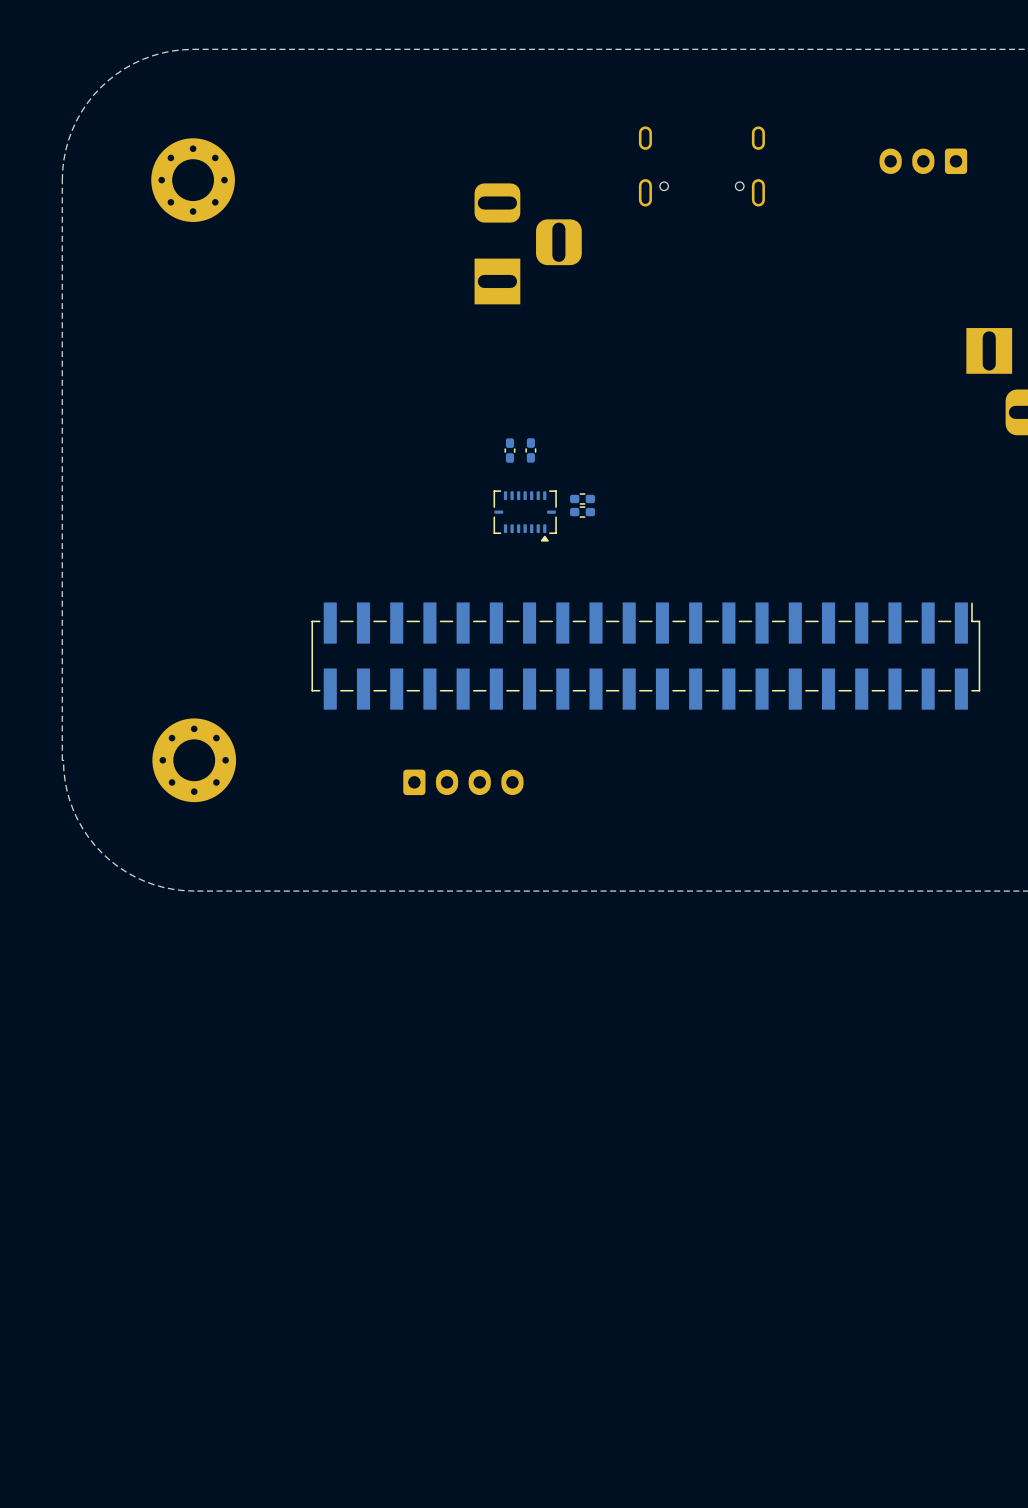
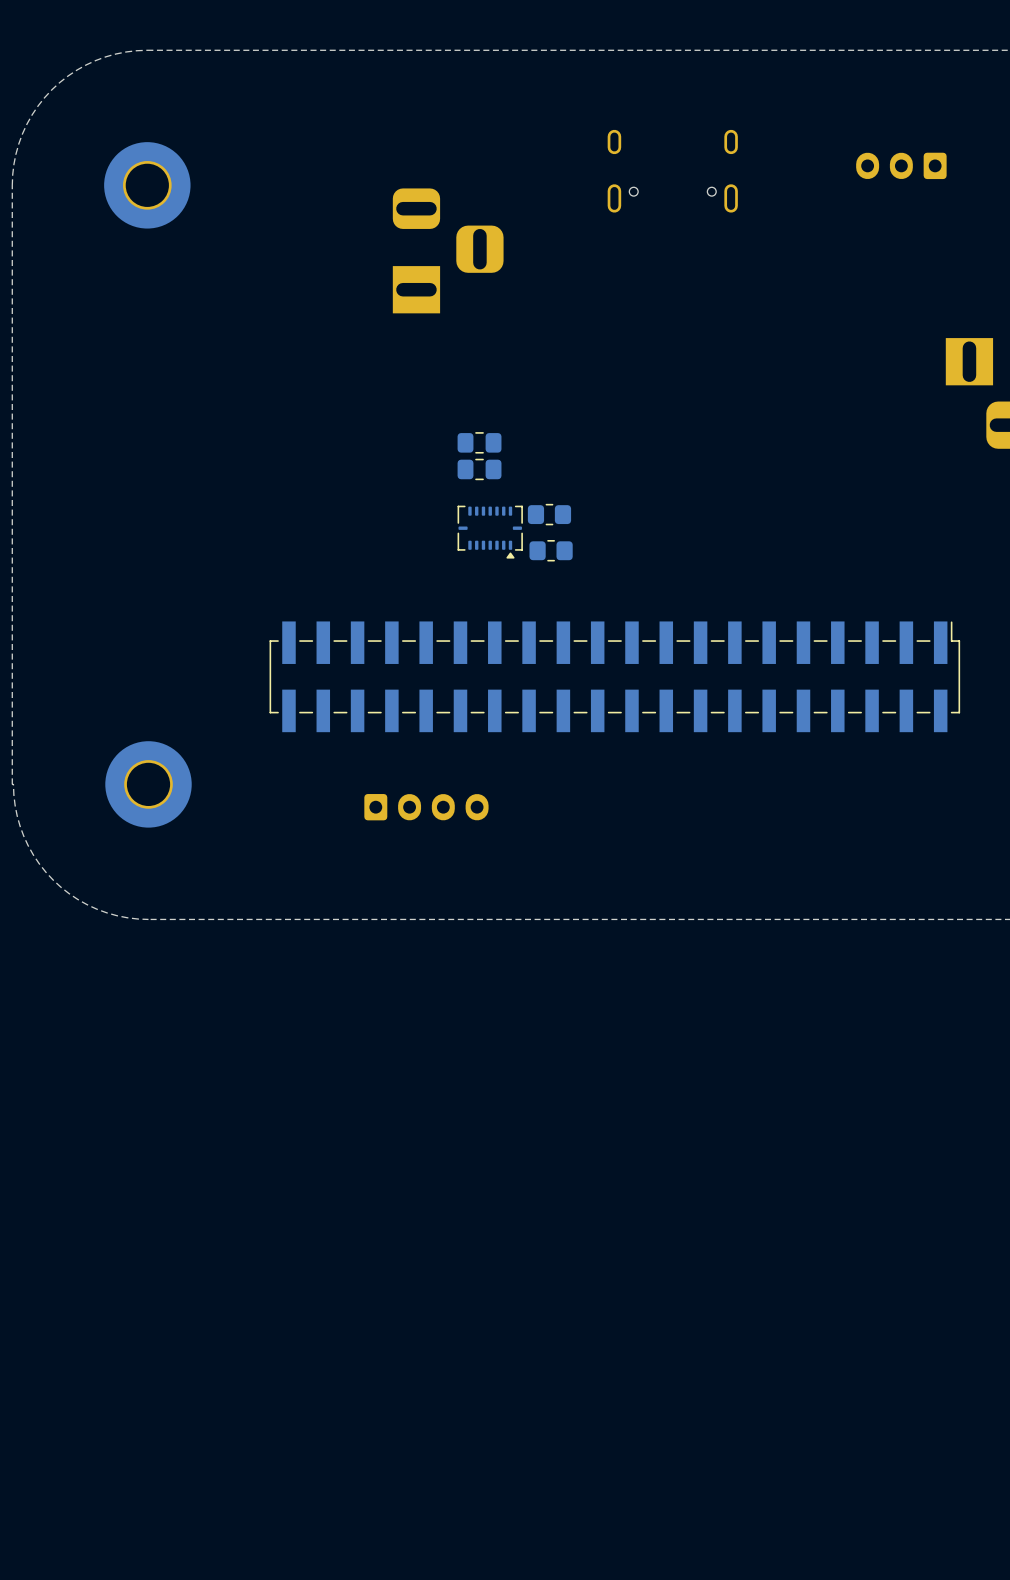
part footprint: [151, 138, 235, 222] -> [104, 142, 191, 229]
part position: (528, 243) -> (448, 250)
part: none -> (479, 442)
part footprint: [504, 438, 516, 463] -> [457, 458, 502, 481]
part: (530, 450) -> none
part footprint: [570, 493, 596, 505] -> [527, 503, 572, 526]
part: (582, 512) -> none
part: none -> (551, 550)
part footprint: [152, 718, 237, 803] -> [105, 741, 192, 828]

